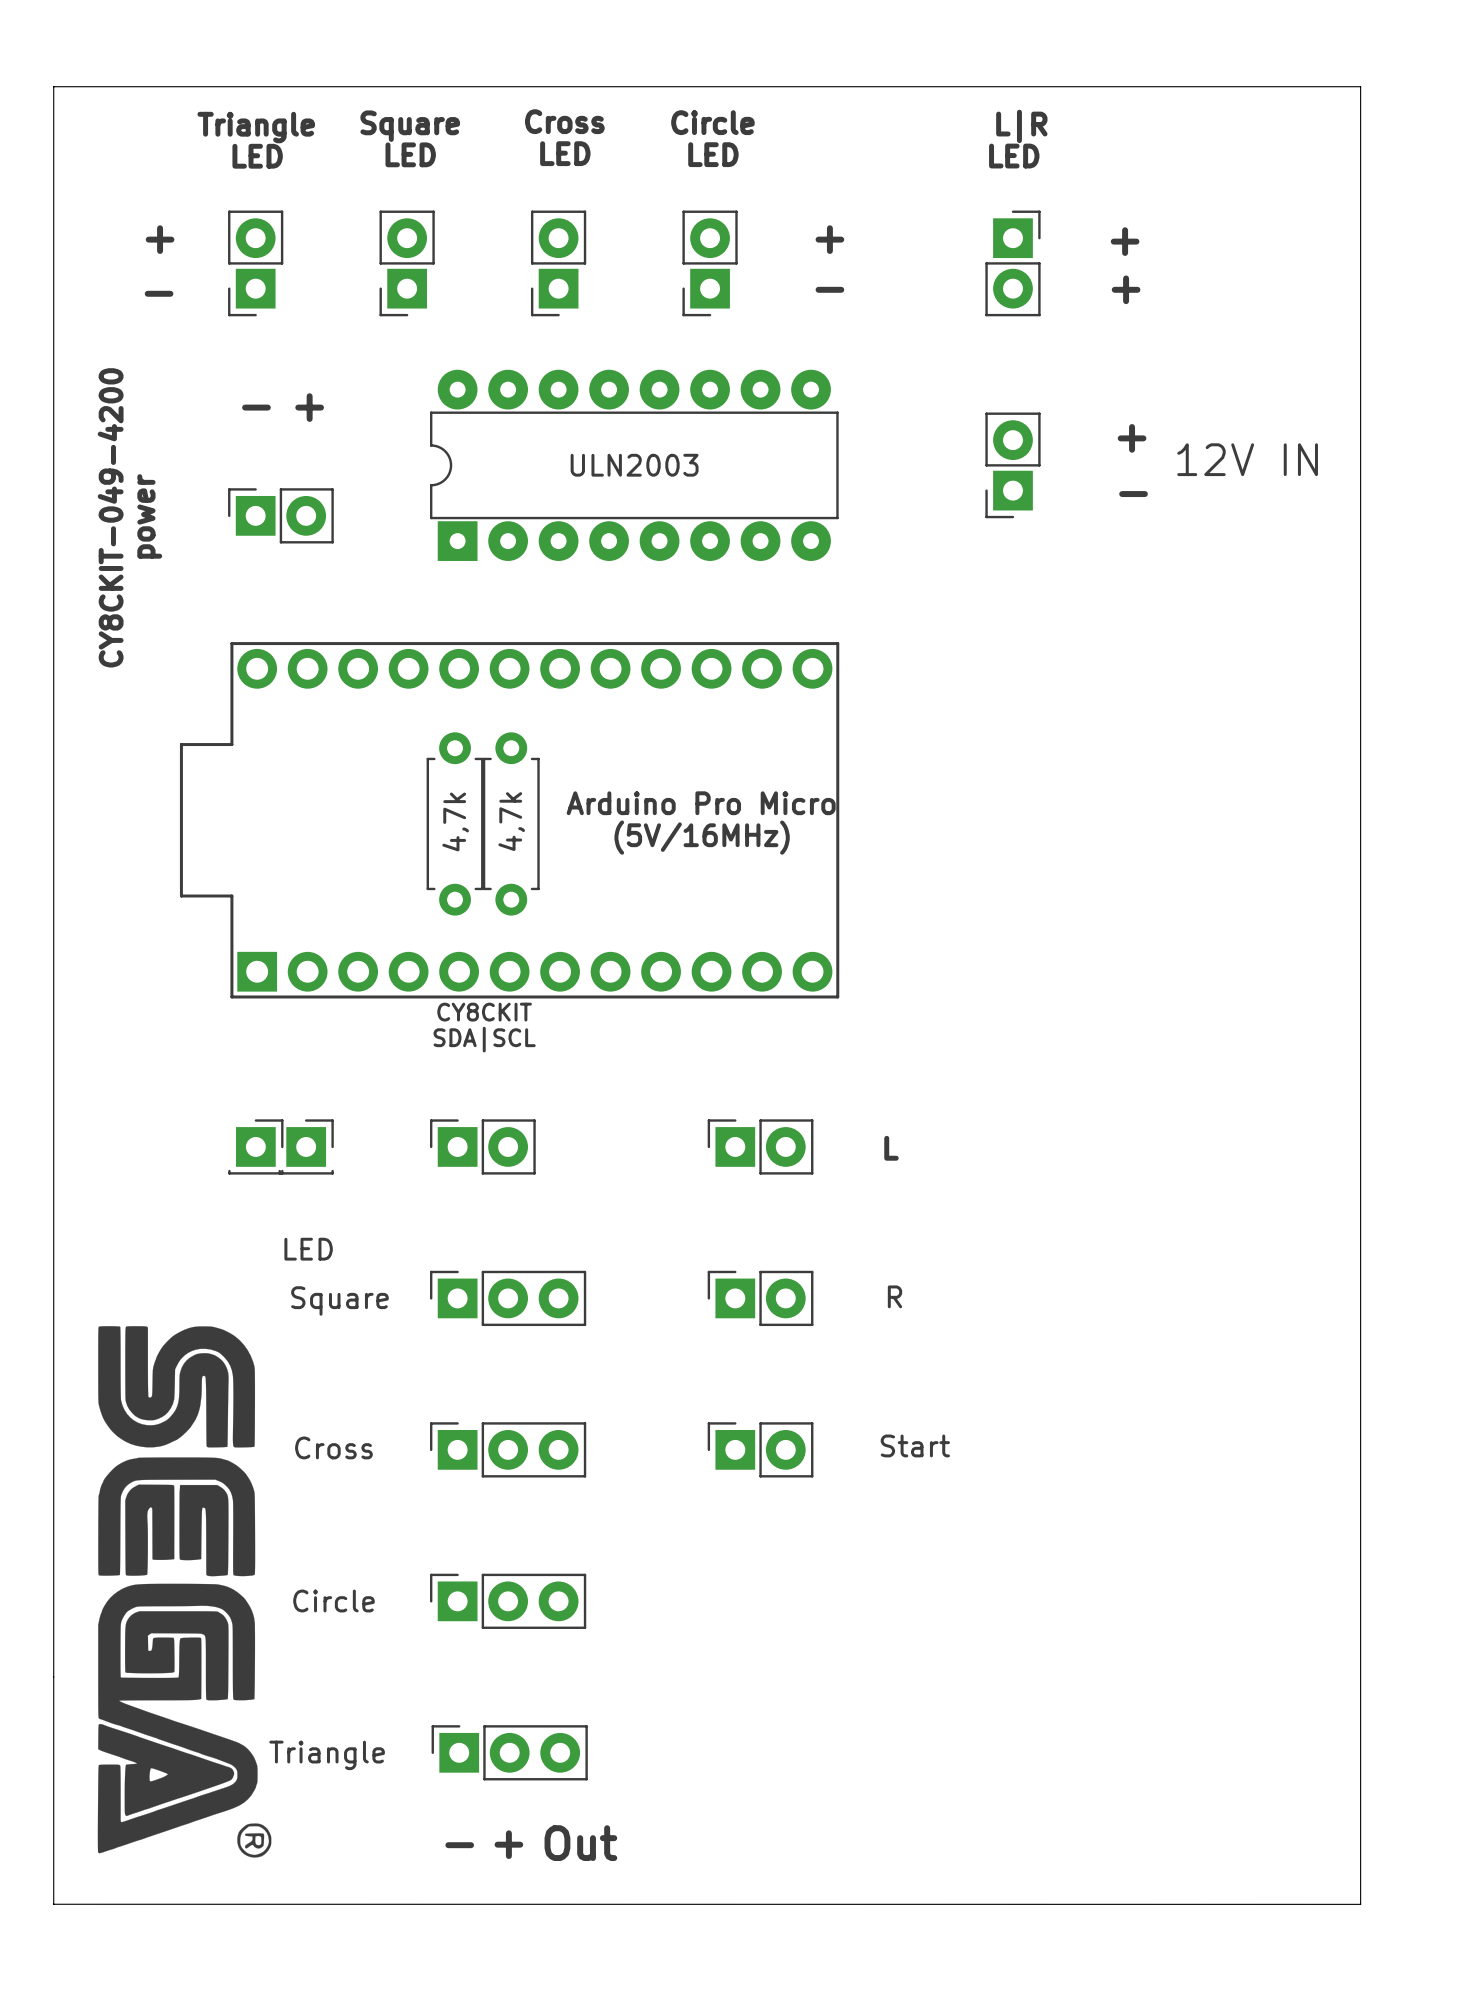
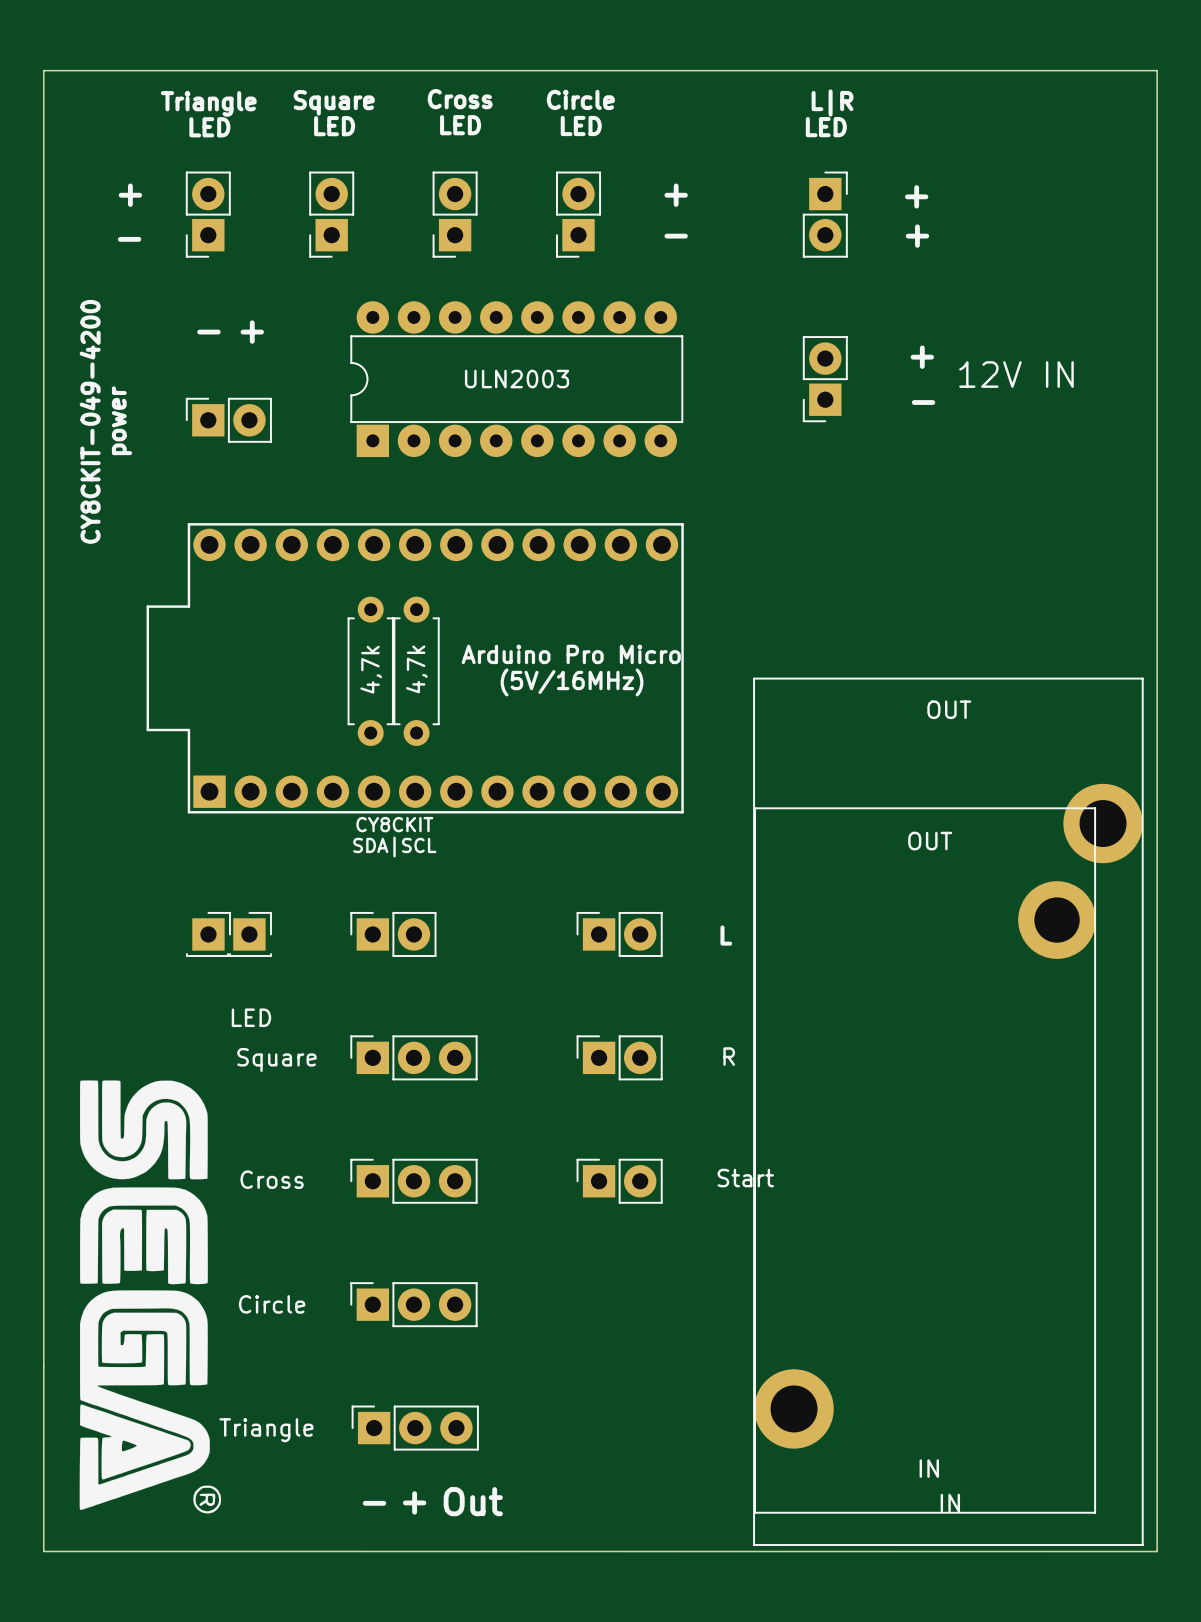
board edge: (1360, 86) (1360, 1904) -> (1108, 70) (1157, 70) (1157, 1551) (1108, 1551)
part: none -> (948, 1111)
part: none -> (925, 1160)

